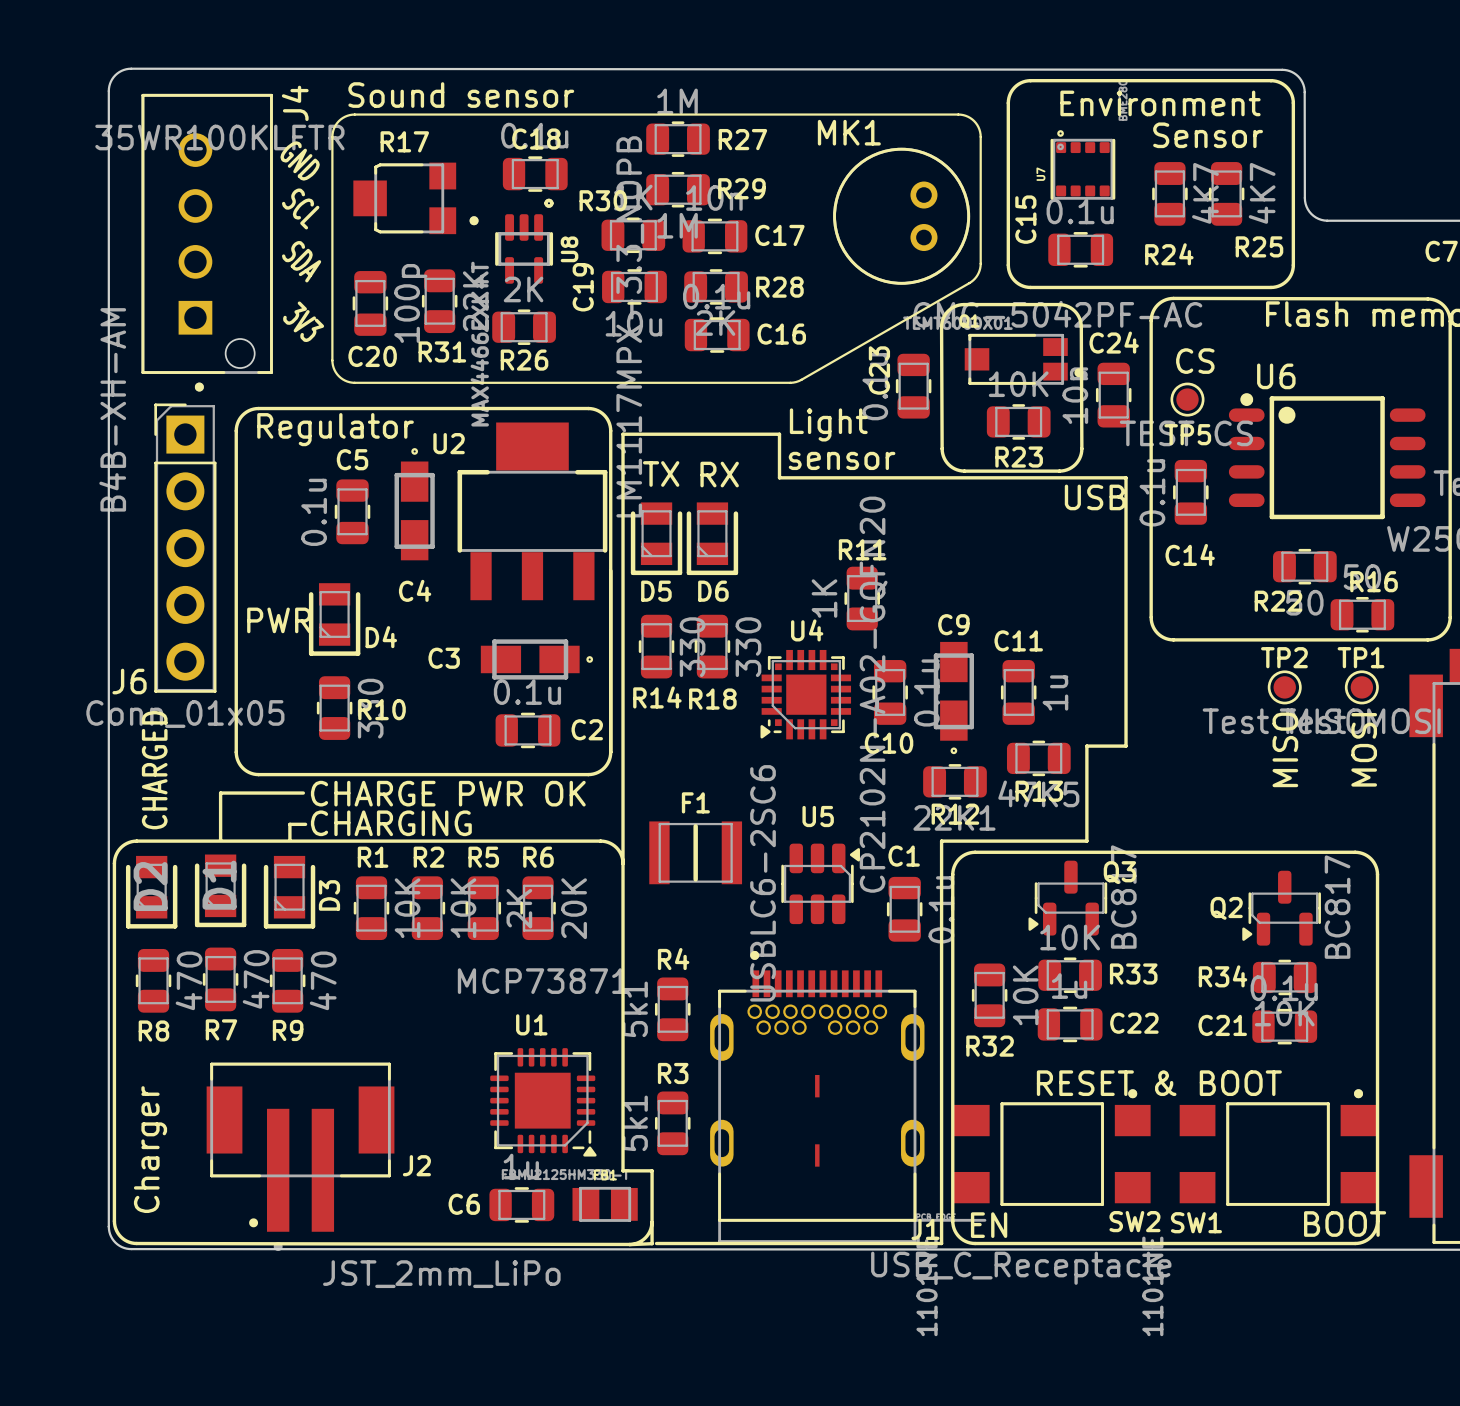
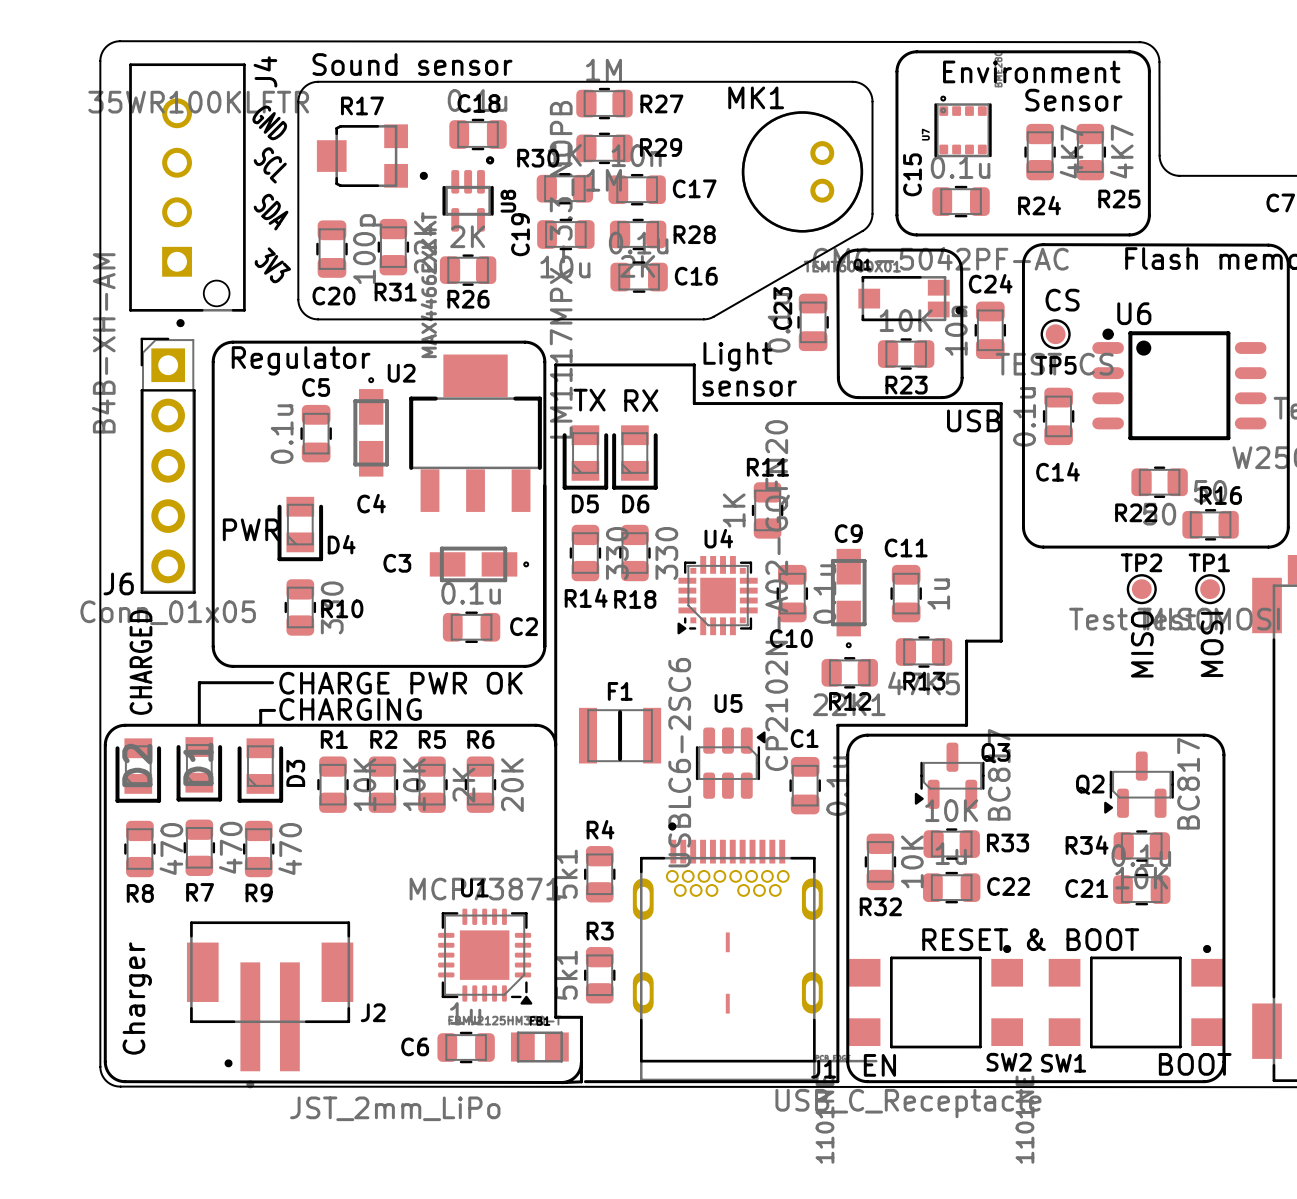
U1 value position: MCP73871 (543, 981) -> MCP73871 (485, 889)

